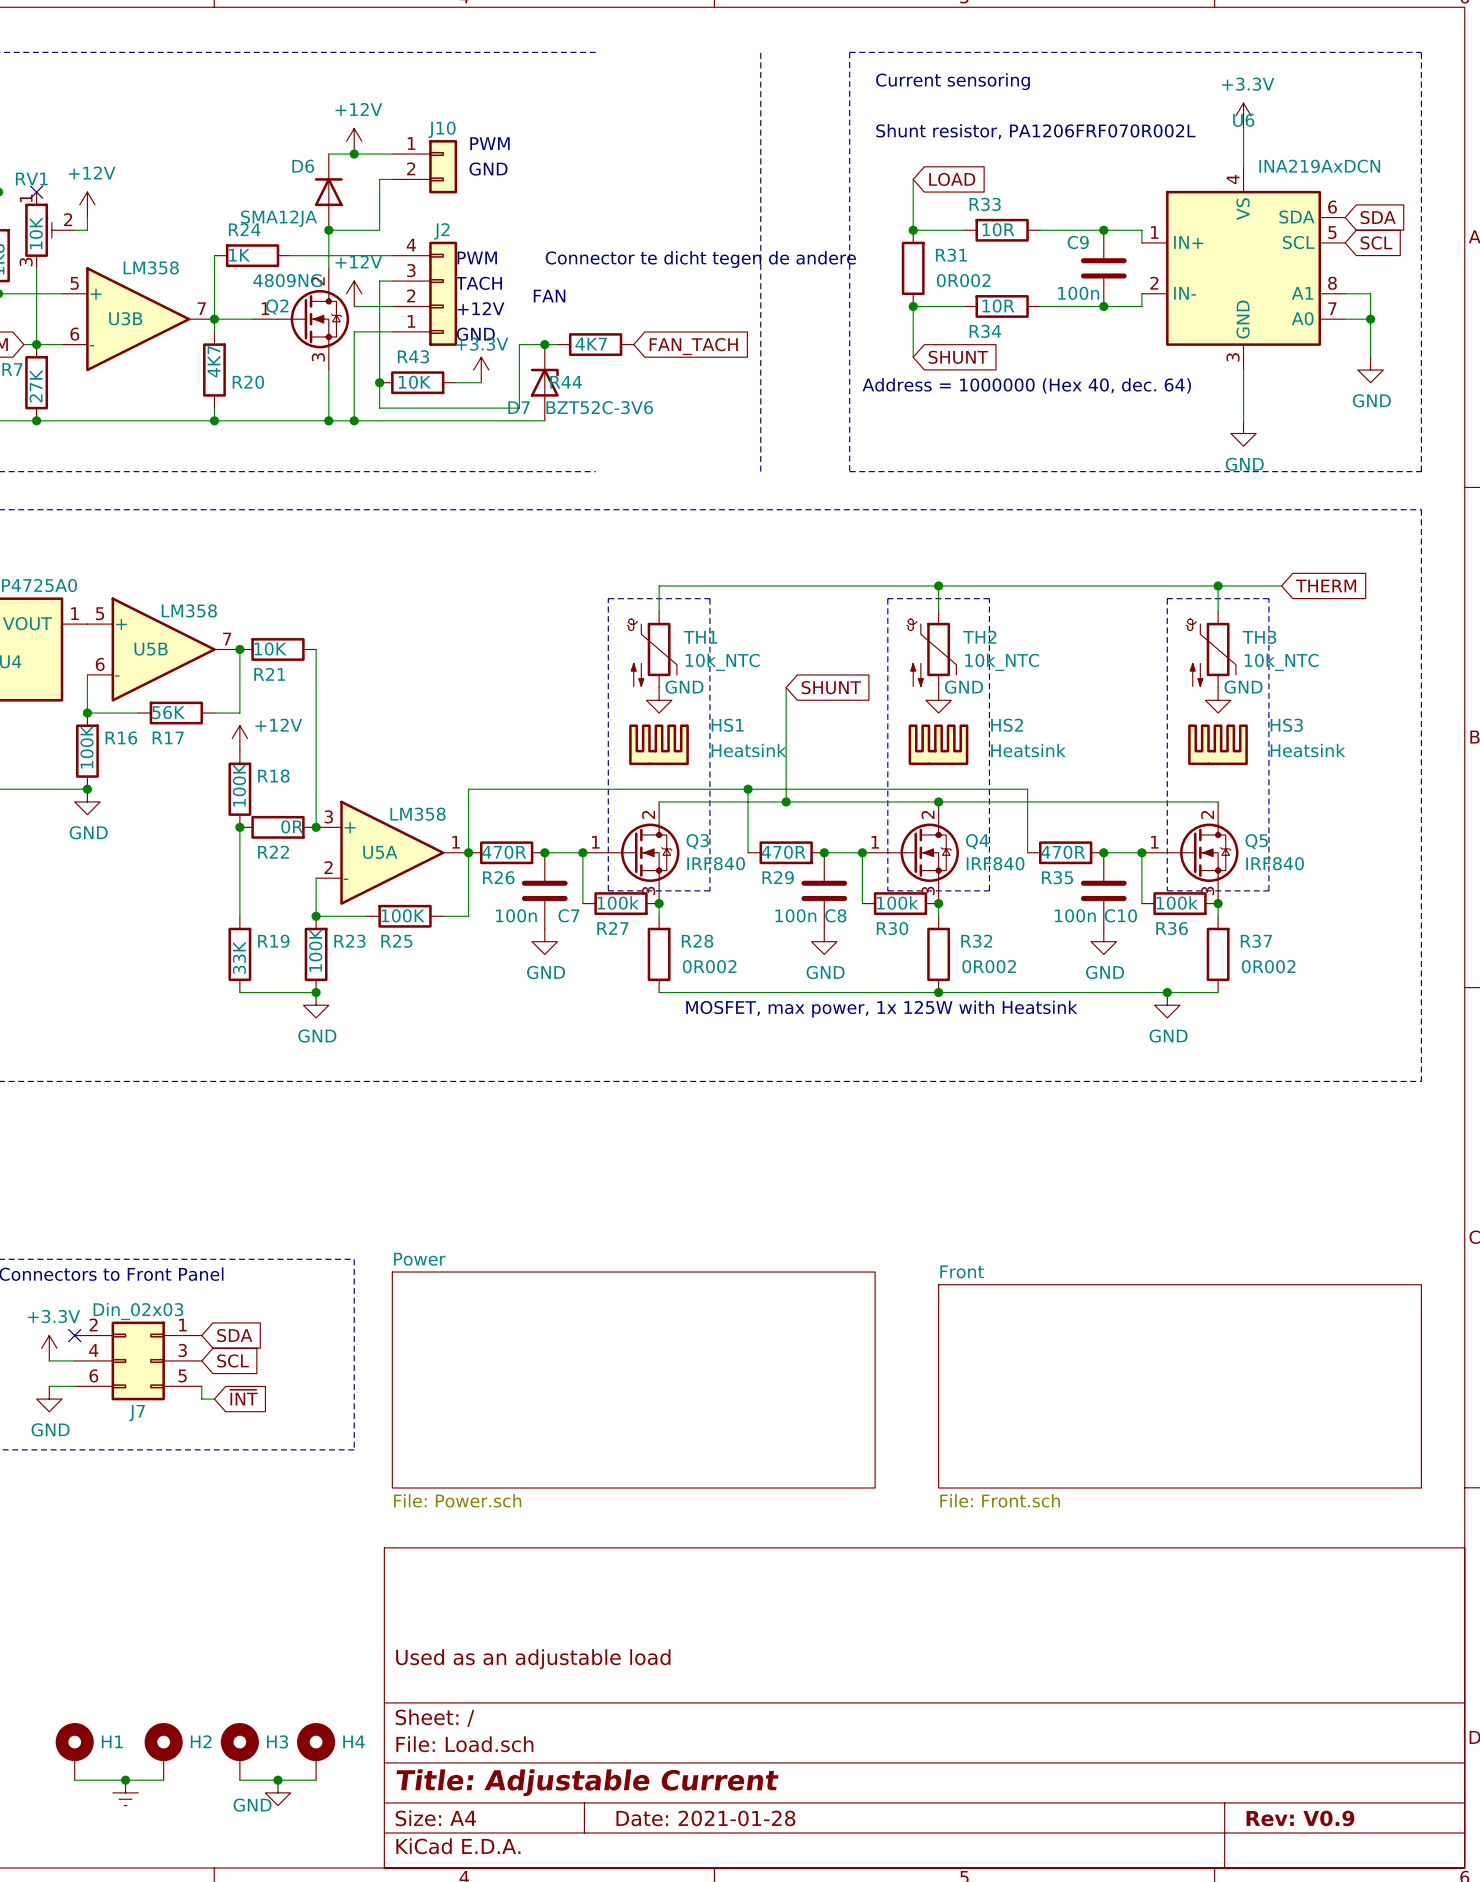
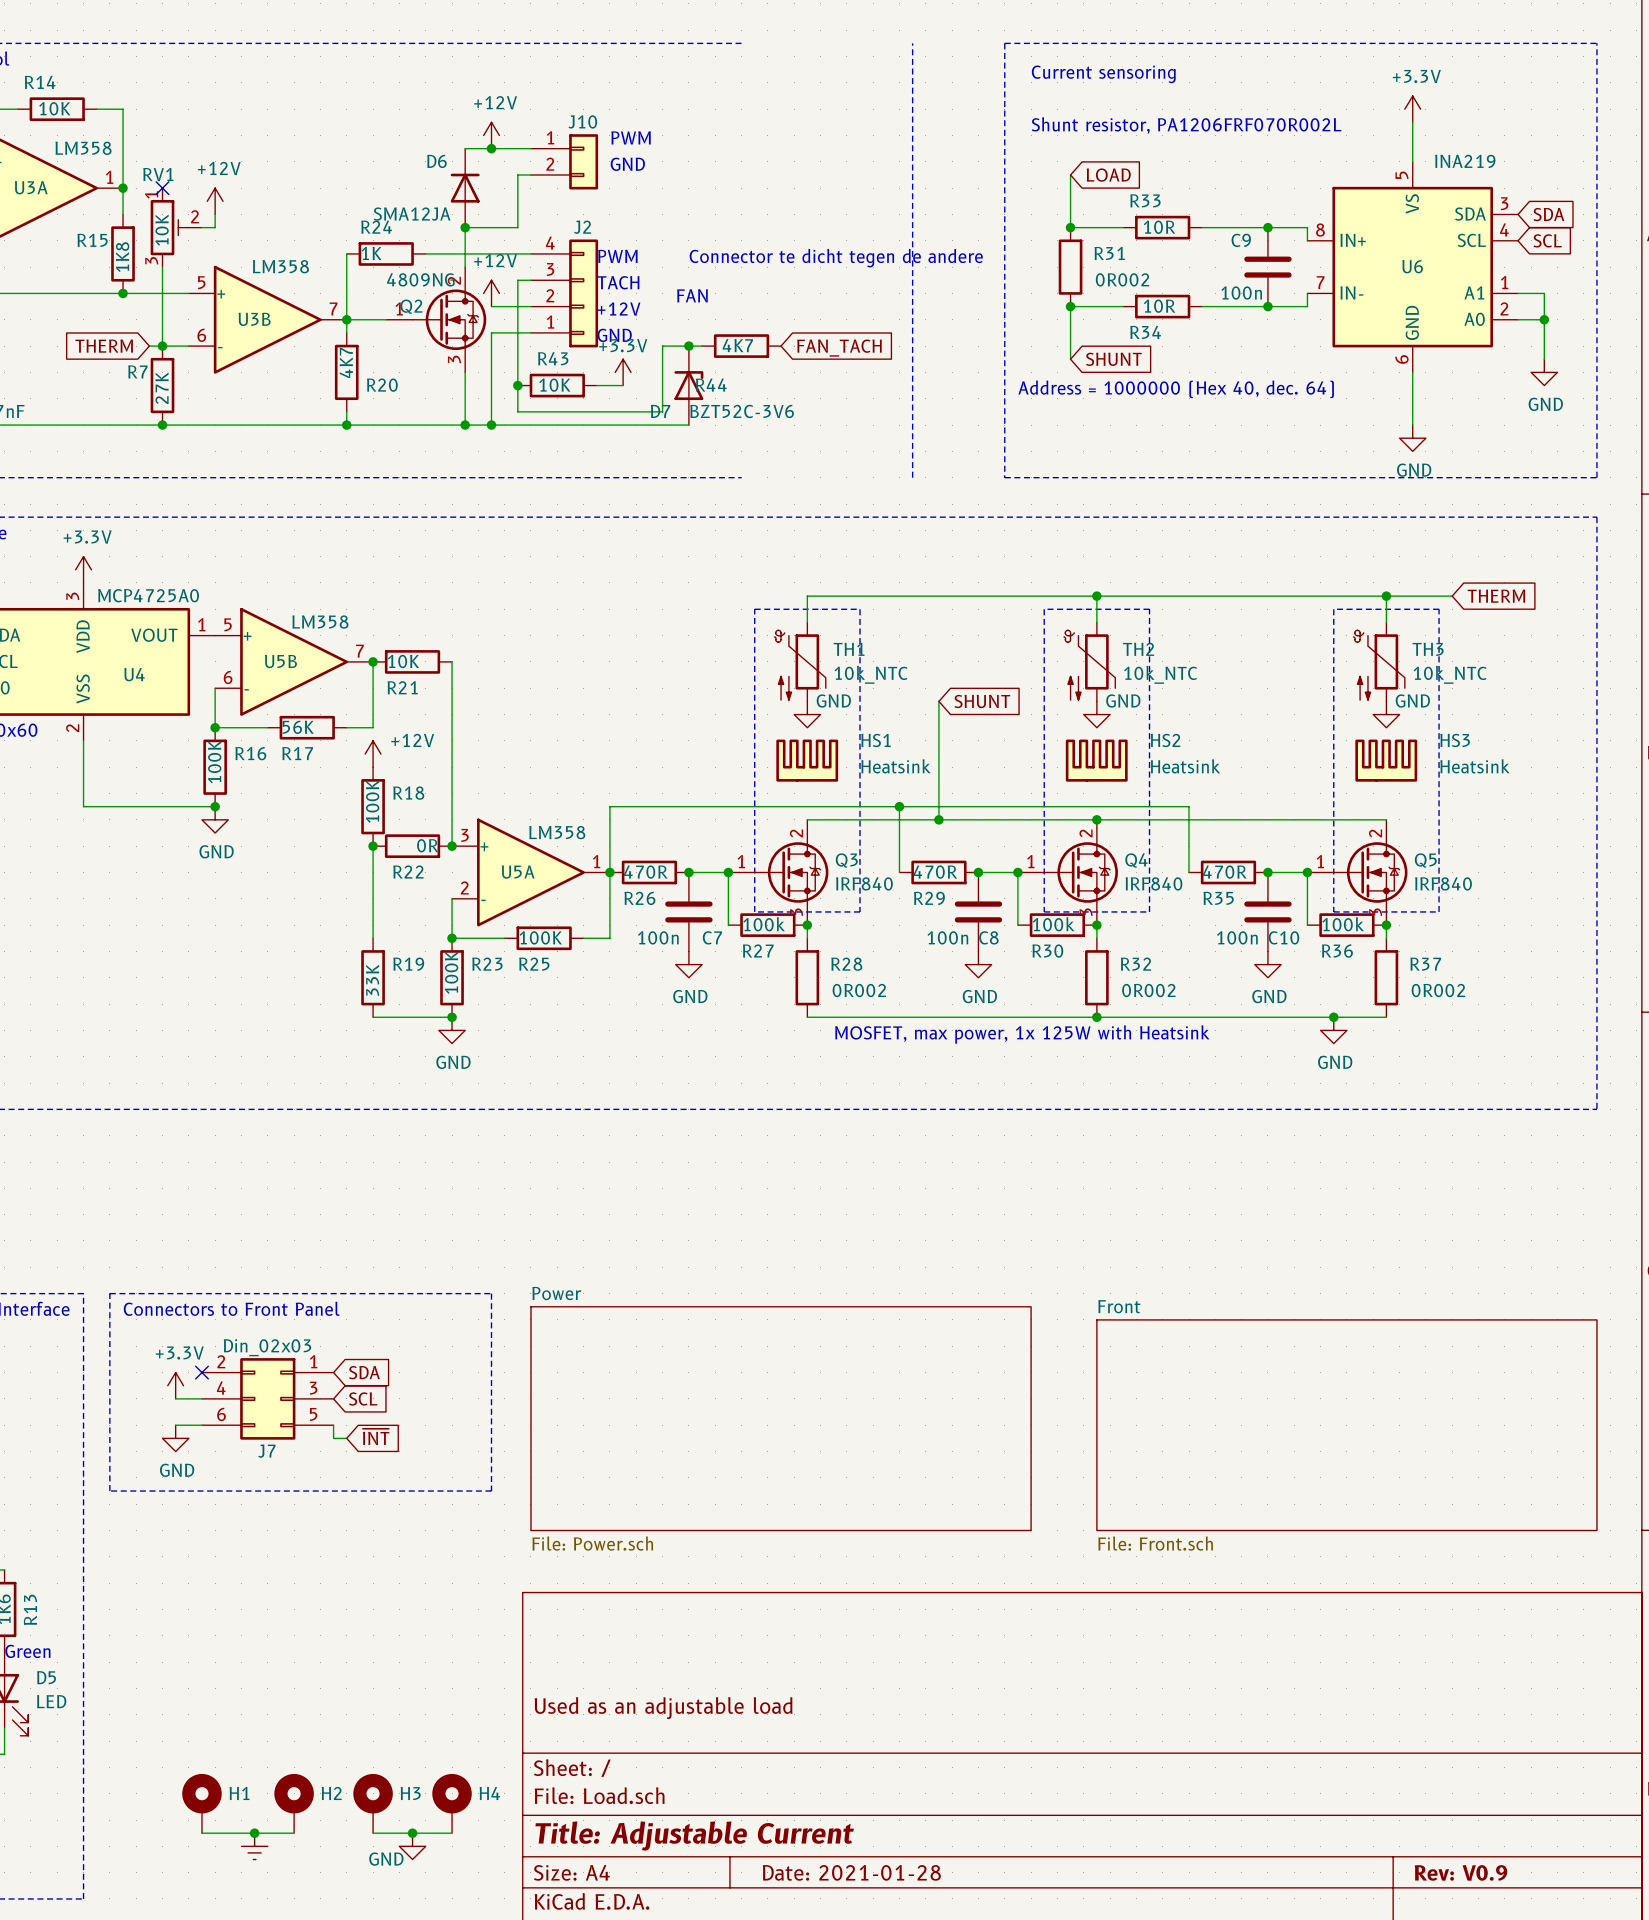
U6 name position: U6 (1243, 120) -> U6 (1412, 266)
U6 value: INA219AxDCN (1319, 166) -> INA219 (1465, 161)
U6 pin number: 4 (1233, 179) -> 5 (1401, 175)
U6 pin number: 6 (1332, 207) -> 3 (1504, 203)
U6 pin number: 1 (1154, 232) -> 8 (1320, 230)
U6 pin number: 5 (1332, 232) -> 4 (1504, 229)
U6 pin number: 2 (1154, 283) -> 7 (1320, 282)
U6 pin number: 8 (1332, 283) -> 1 (1504, 282)
U6 pin number: 7 (1332, 308) -> 2 (1504, 308)
U6 pin number: 3 (1233, 357) -> 6 (1401, 359)

